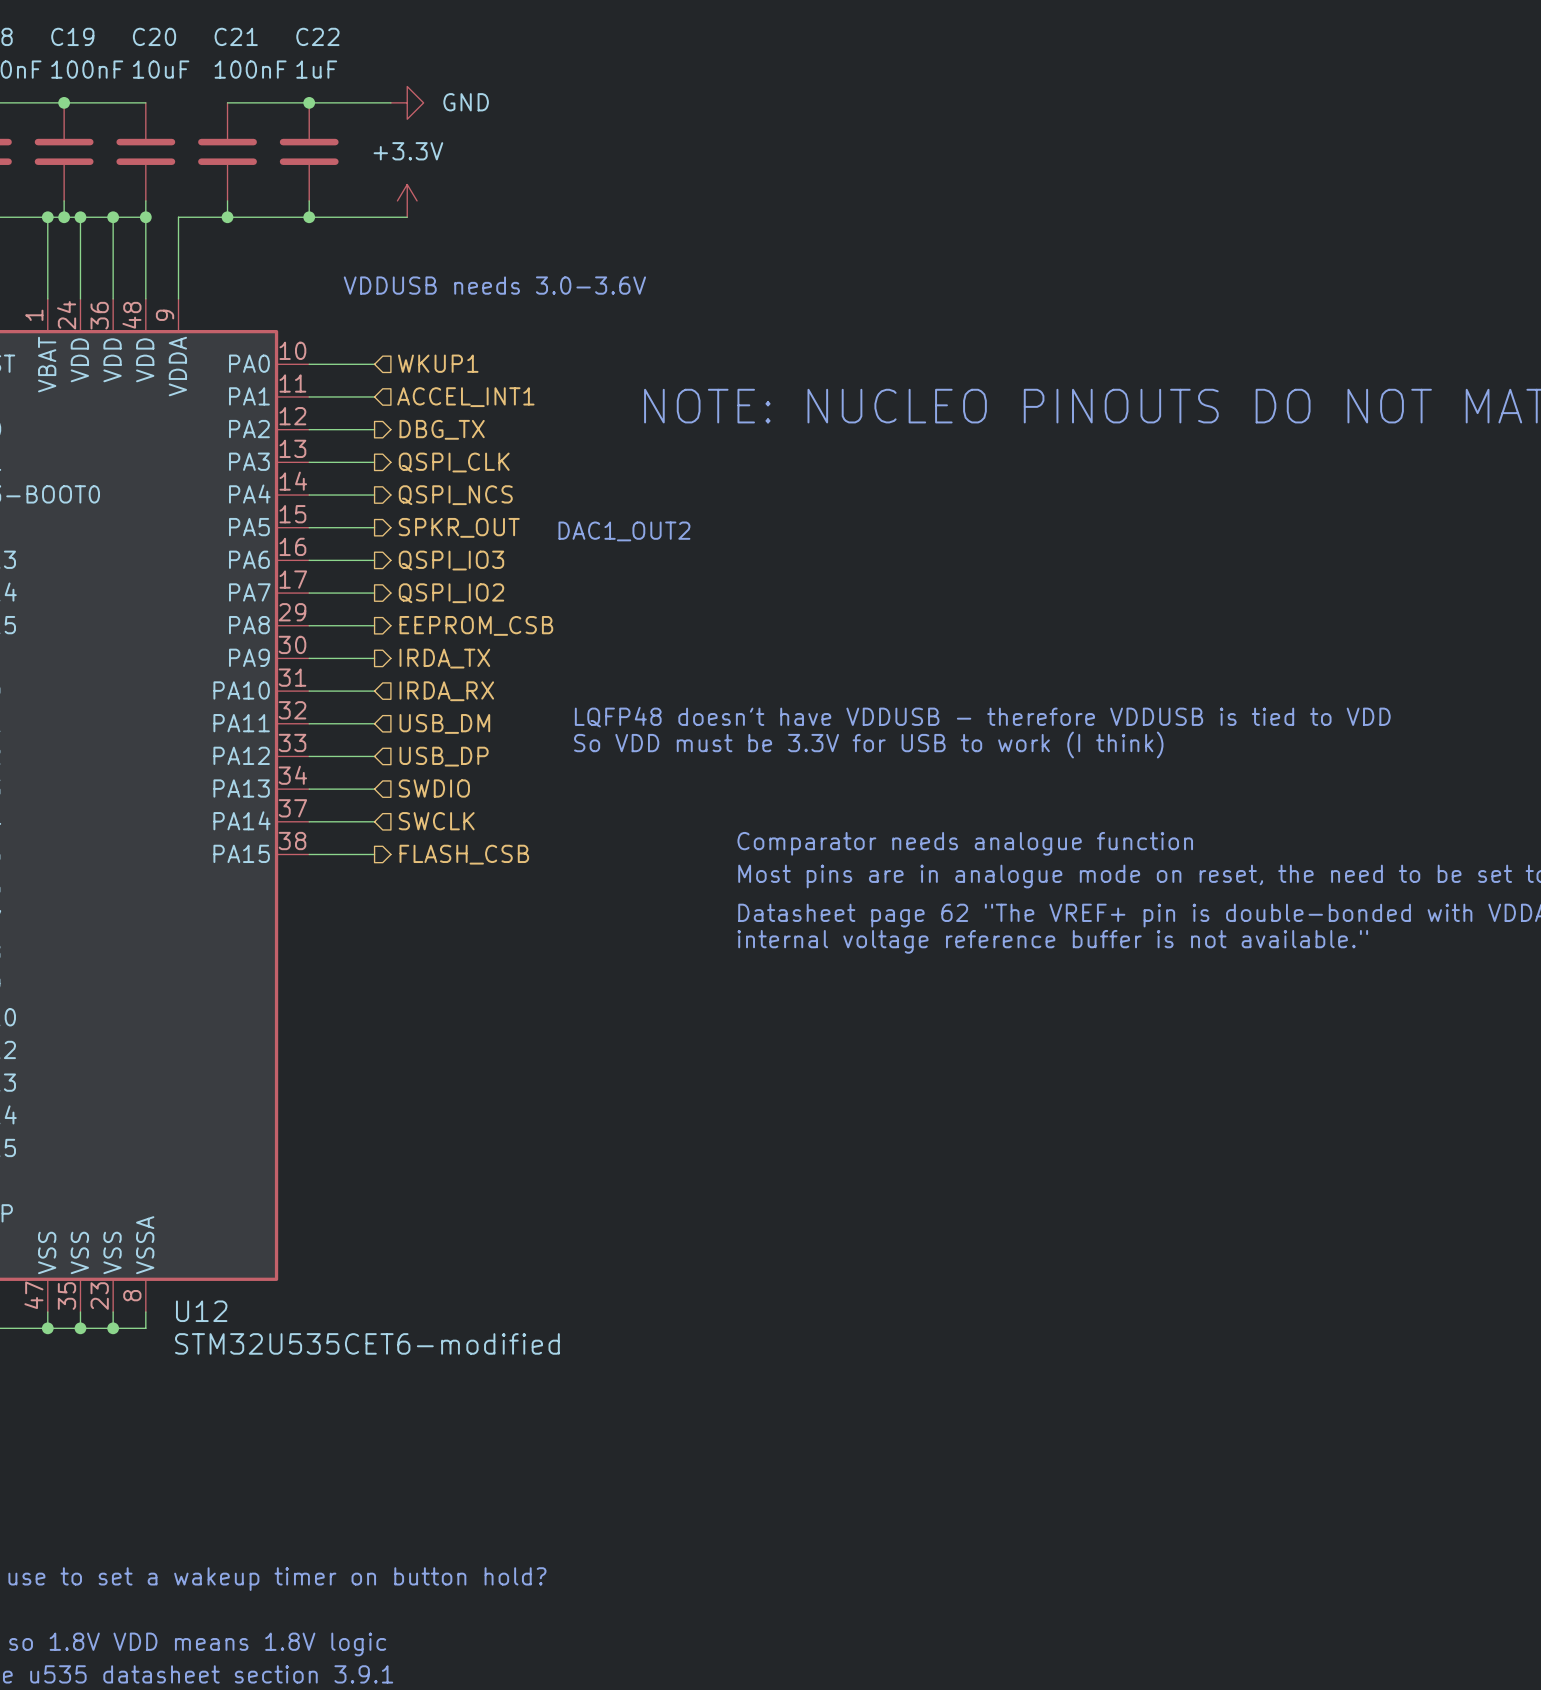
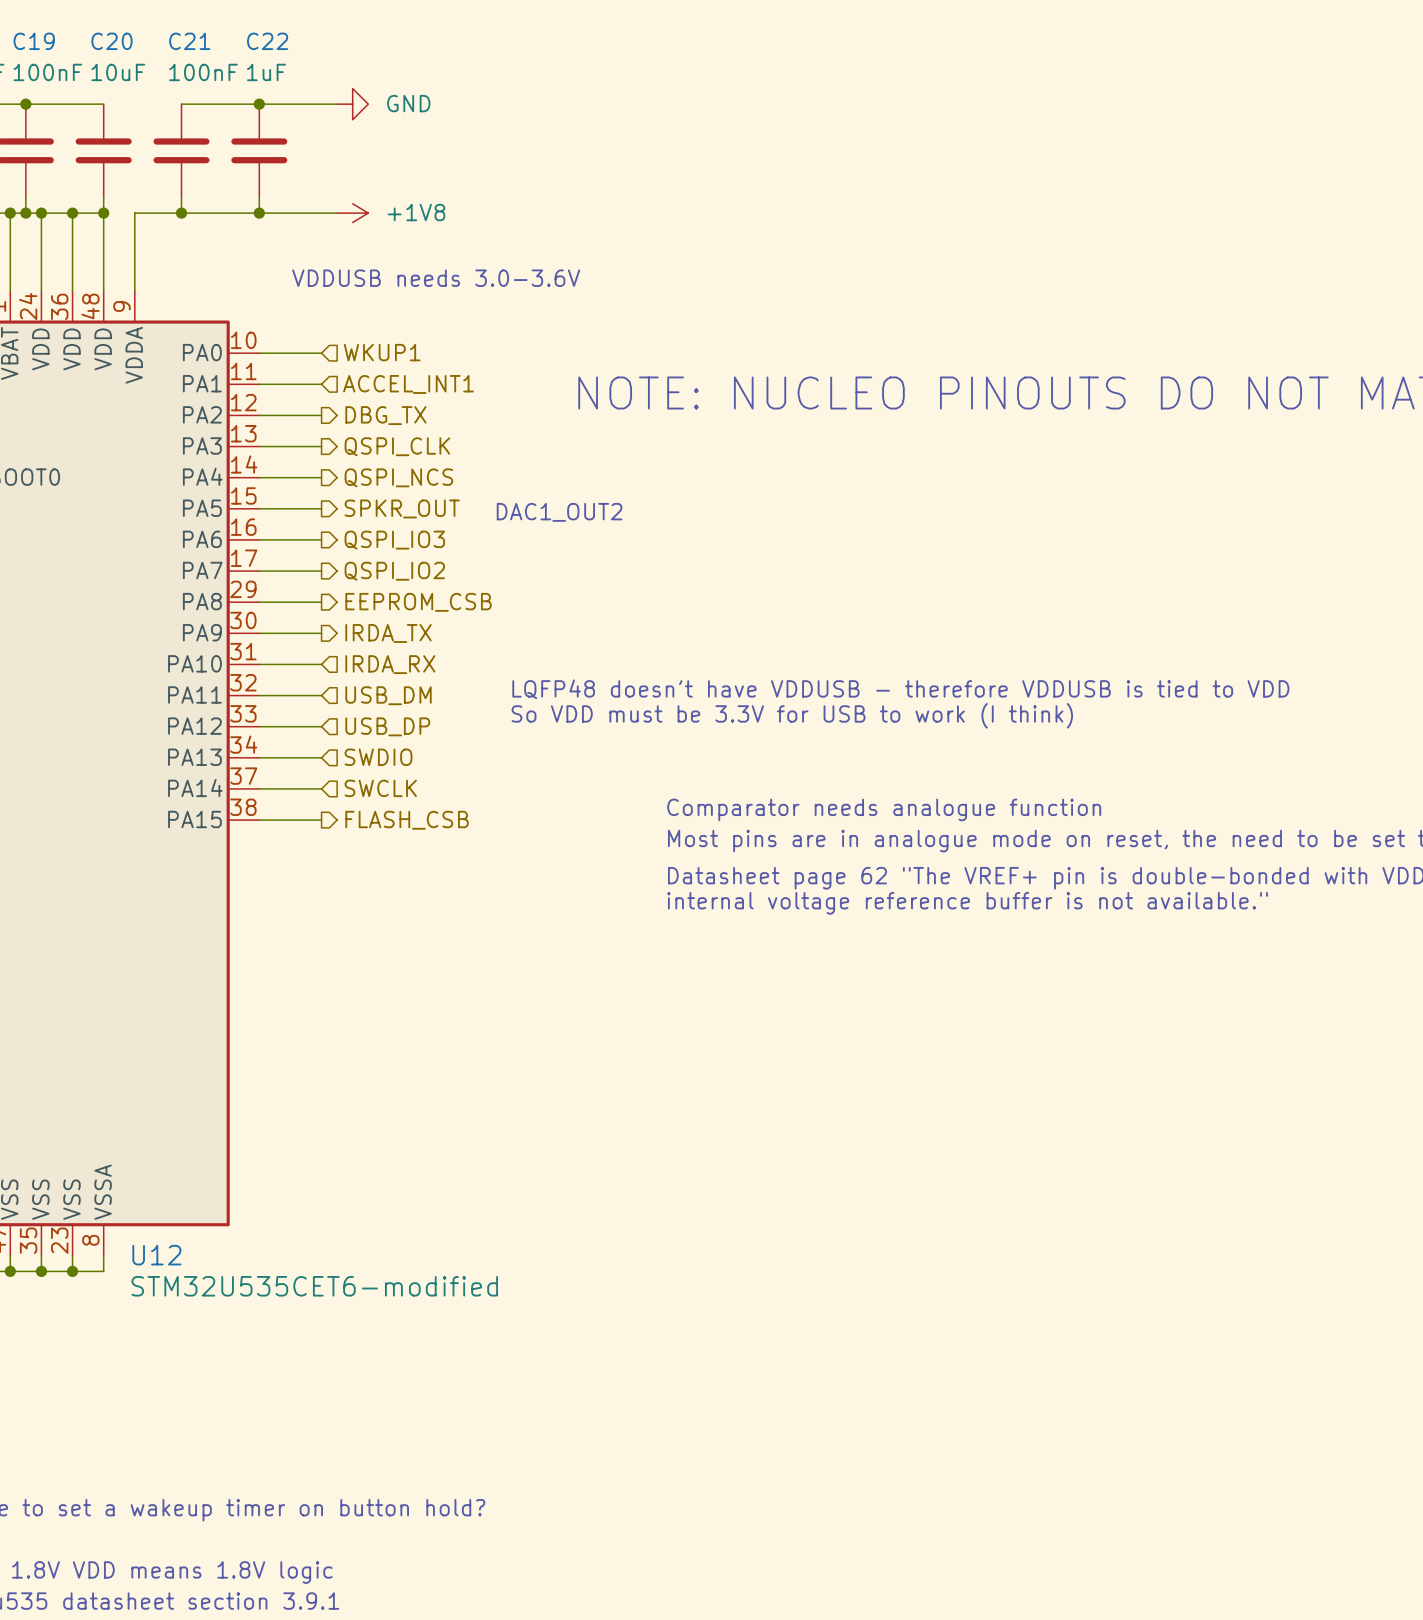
power symbol: +3.3V (407, 200) -> none
power symbol: none -> +1V8 (352, 213)

